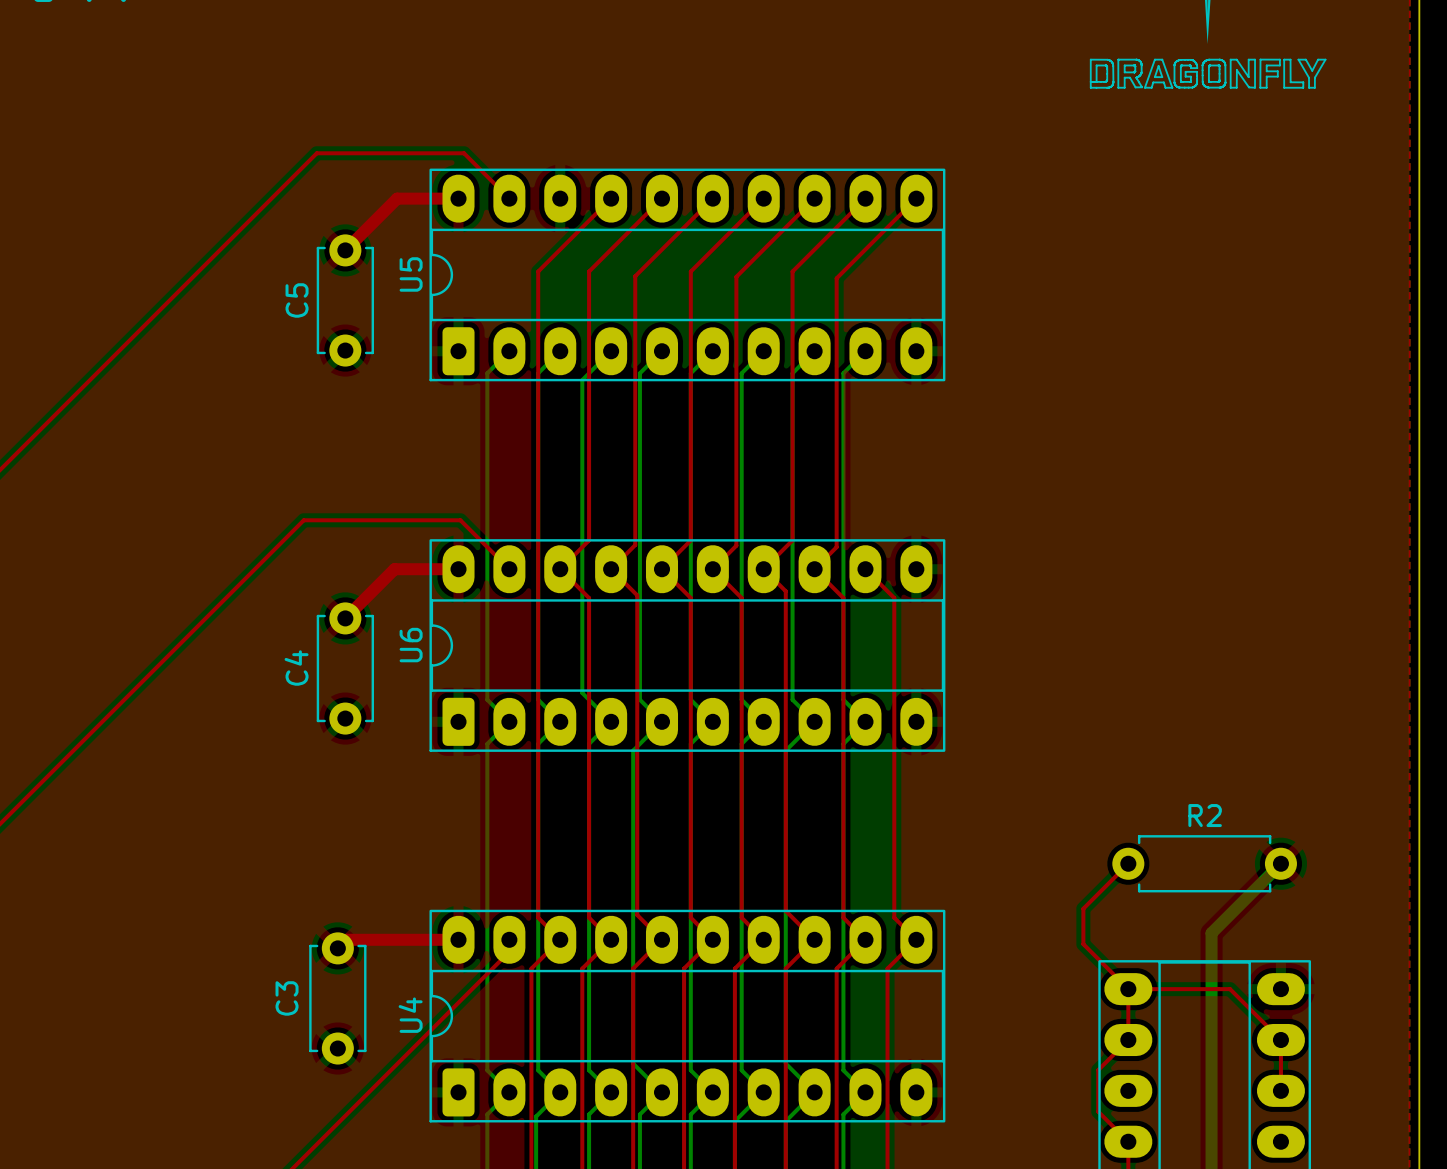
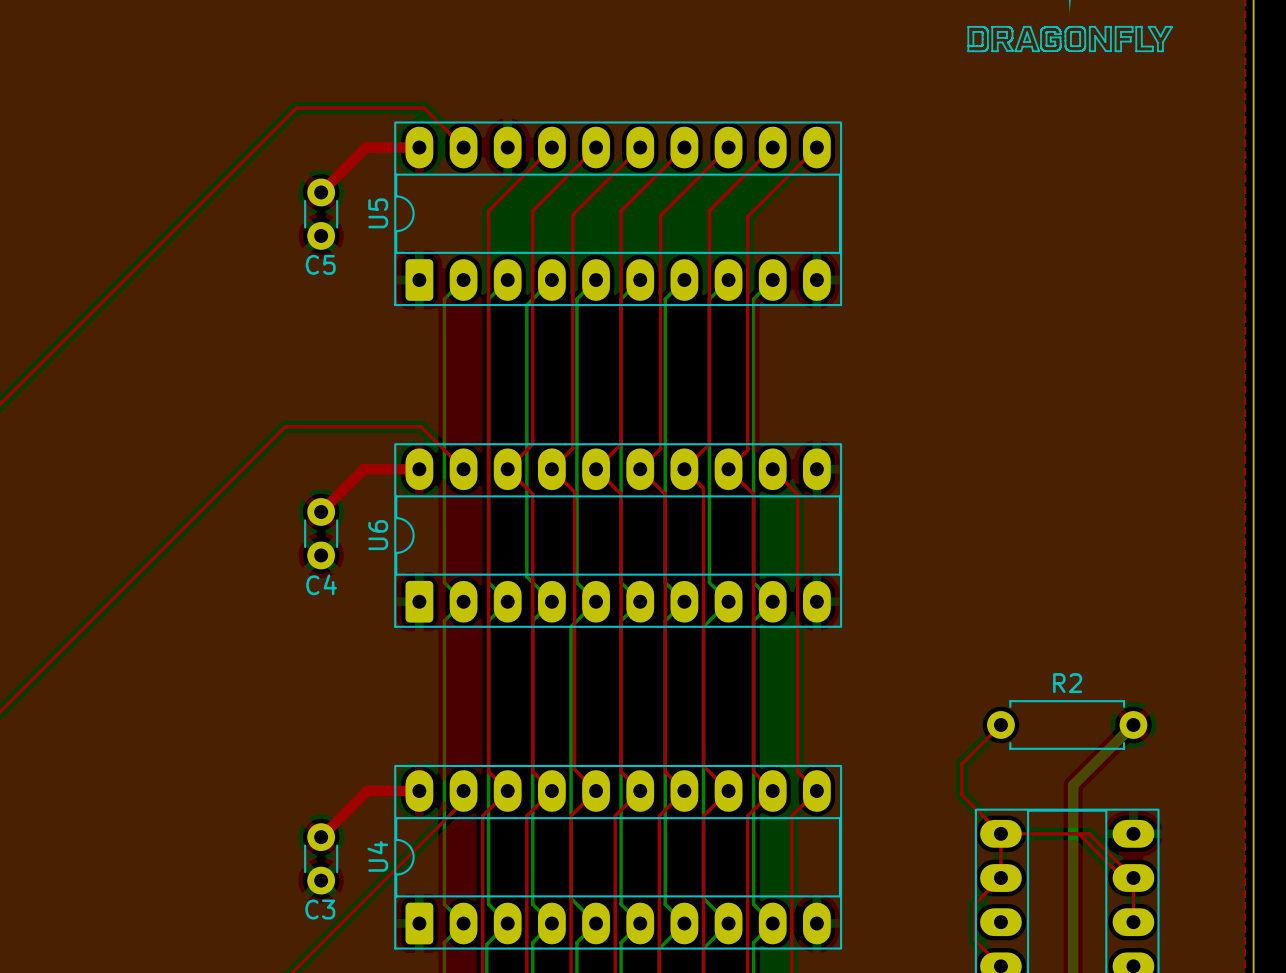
C5 footprint: [316, 234, 374, 367] -> [304, 178, 339, 250]
C5 name position: C5 (297, 300) -> C5 (320, 264)
C4 footprint: [316, 602, 374, 735] -> [304, 498, 339, 570]
C4 name position: C4 (296, 668) -> C4 (321, 584)
C3 footprint: [309, 932, 367, 1065] -> [304, 823, 339, 895]
top track: (398, 939) (346, 939) (337, 948) -> (367, 791) (321, 837)
top track: none -> (1078, 833) (1133, 888)
C3 name position: C3 (287, 998) -> C3 (320, 909)

